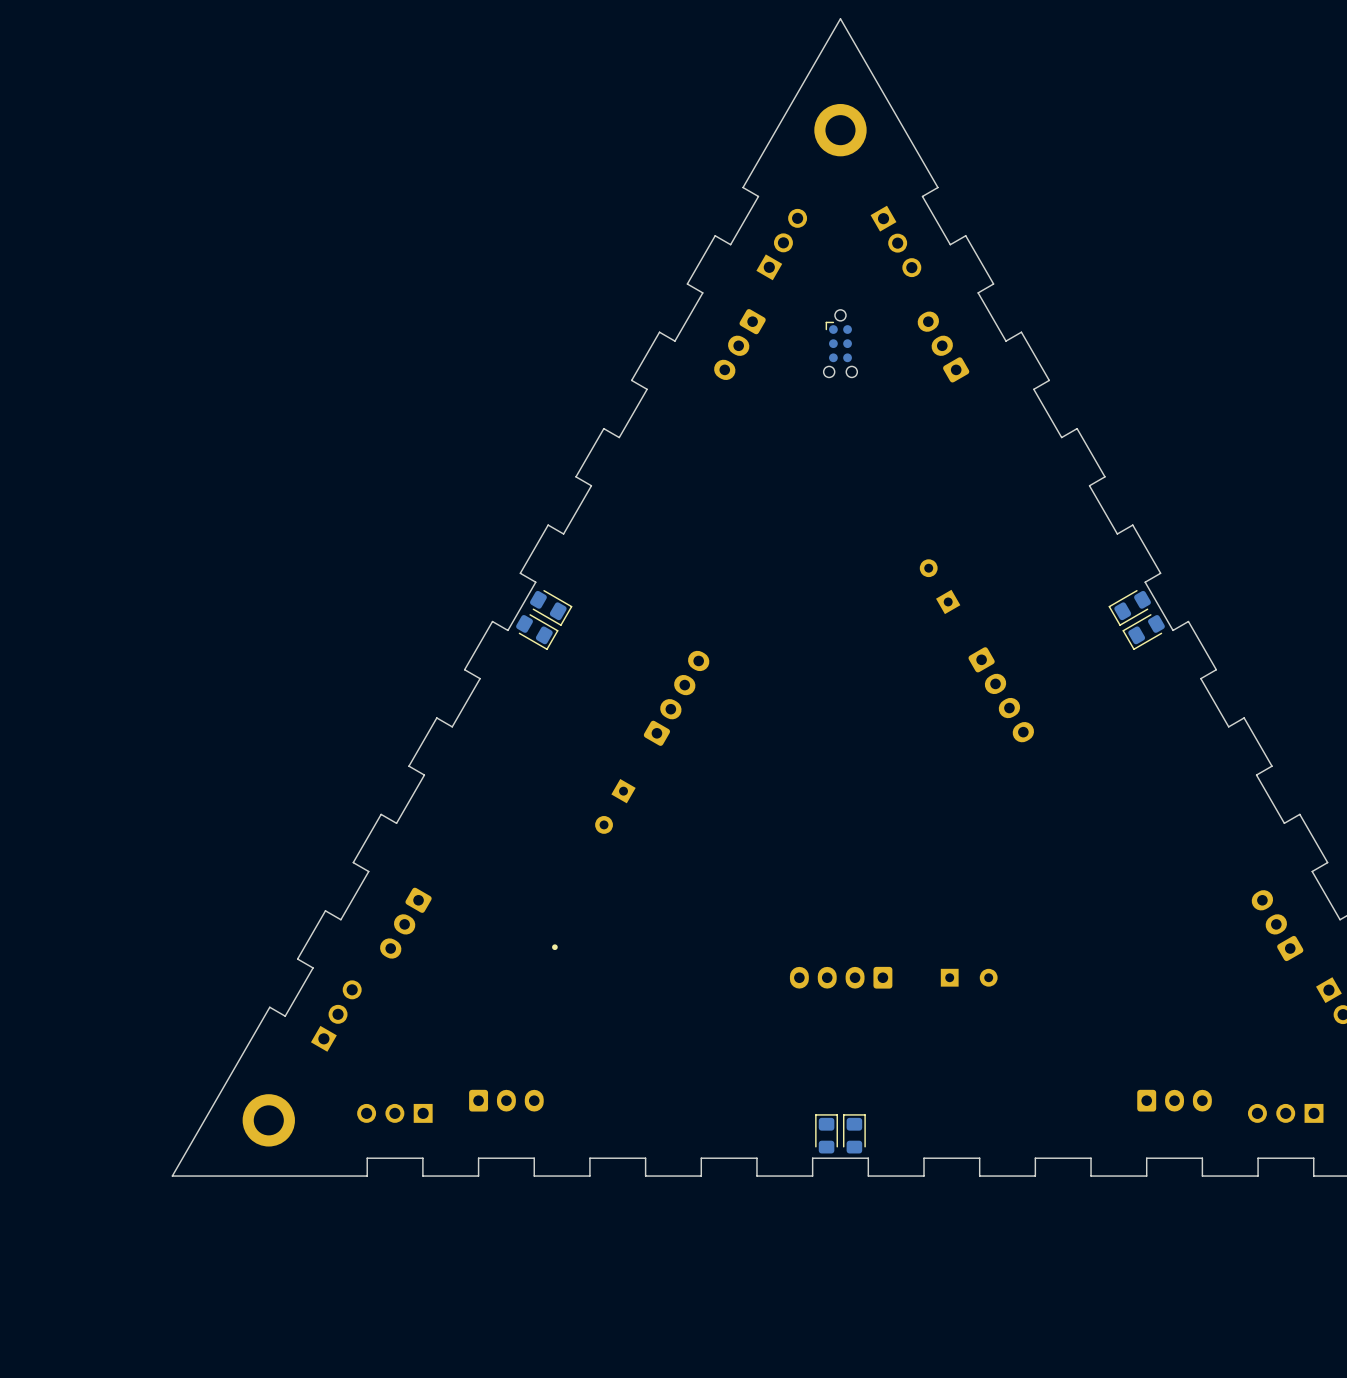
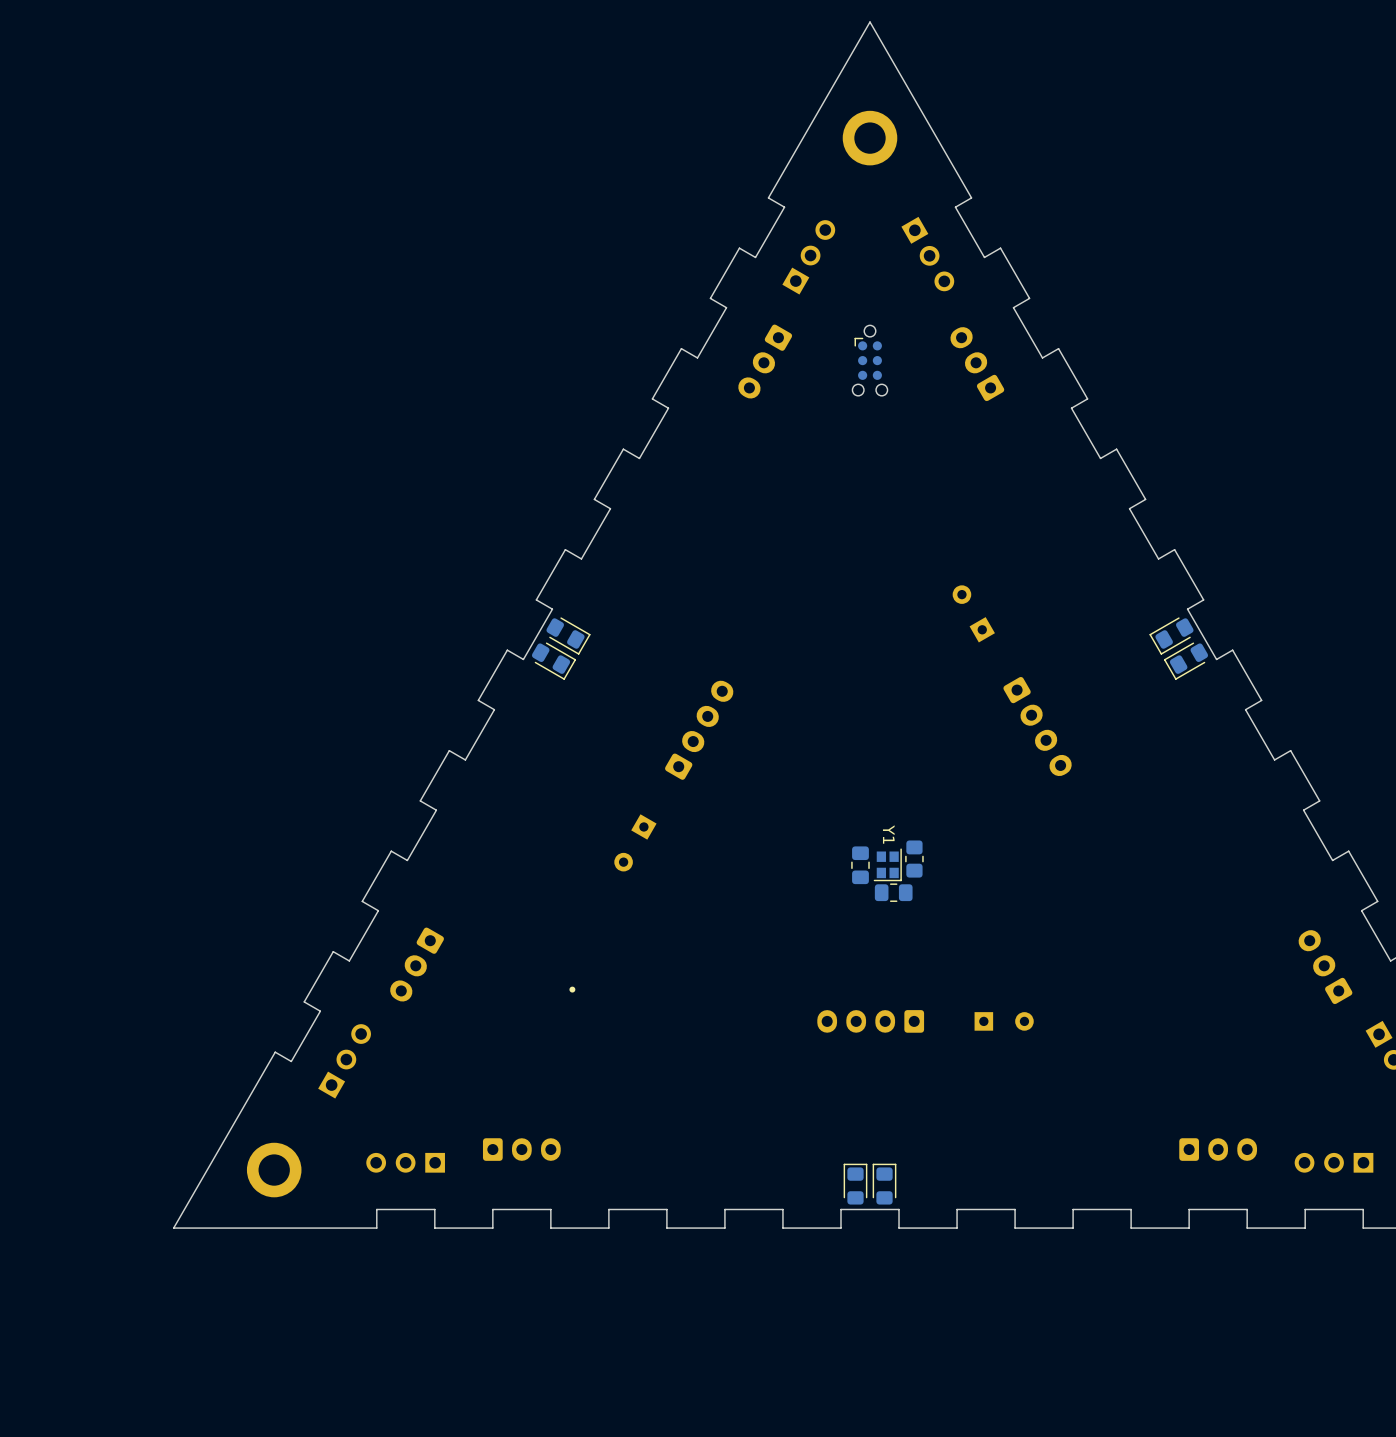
part: none -> (914, 859)
part: none -> (860, 865)
Y1: none -> (887, 864)
part: none -> (893, 892)

